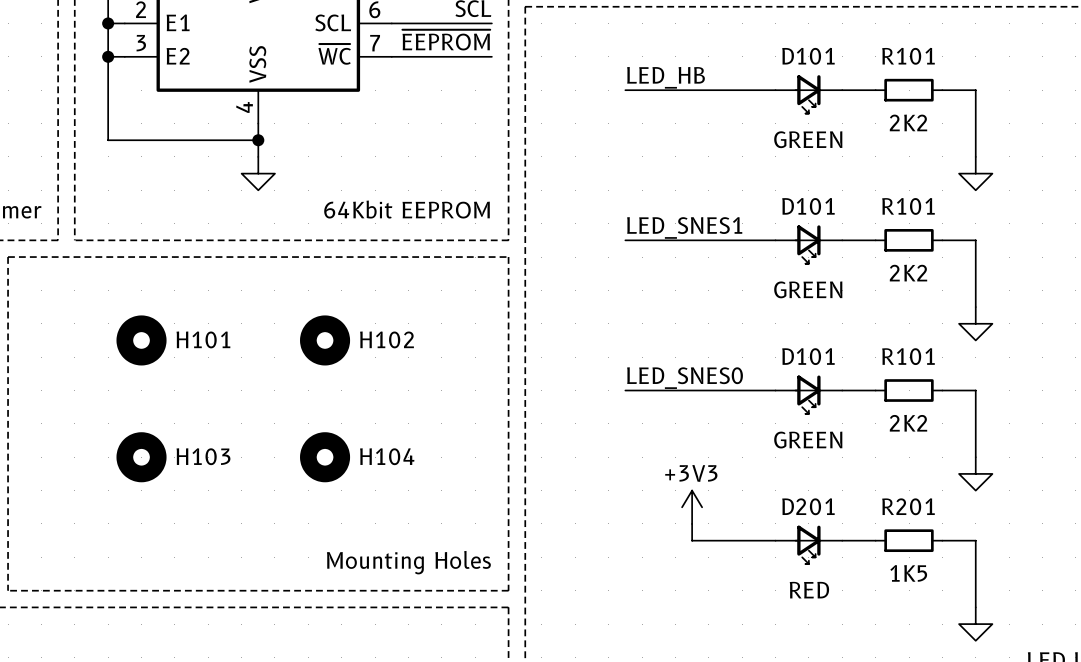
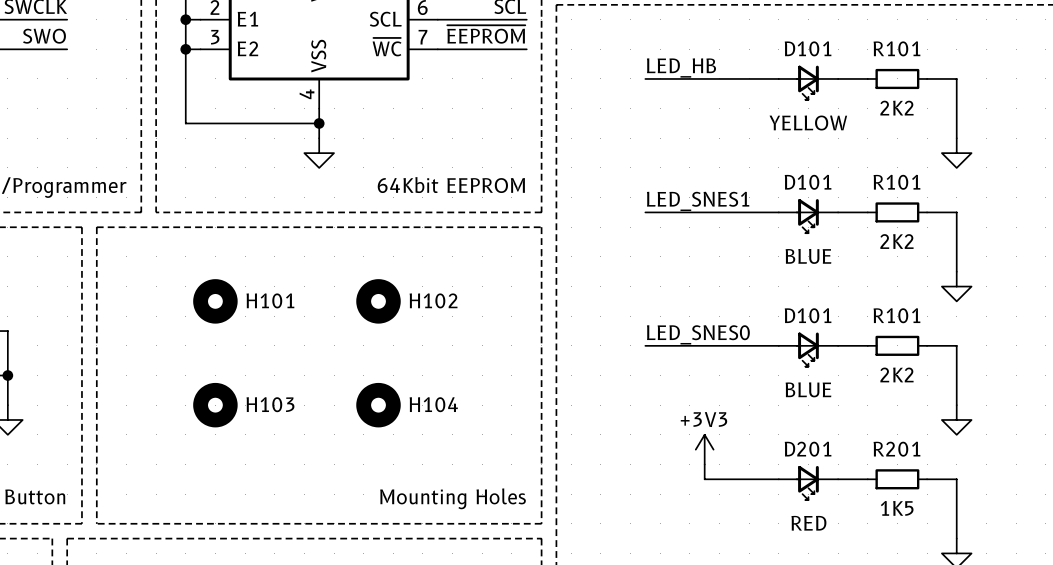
D101 value: GREEN (808, 139) -> YELLOW (808, 122)
D101 value: GREEN (808, 289) -> BLUE (808, 256)
D101 value: GREEN (808, 440) -> BLUE (808, 389)

